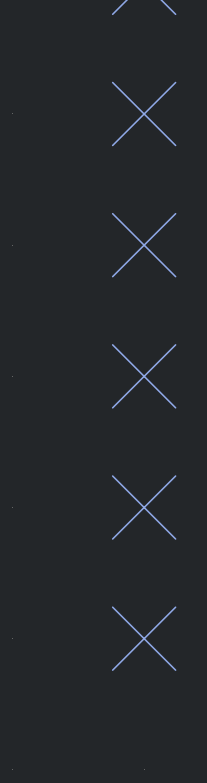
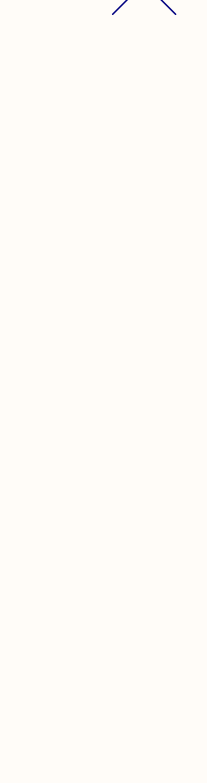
no-connect mark: (144, 113) -> none
no-connect mark: (144, 245) -> none
no-connect mark: (144, 376) -> none
no-connect mark: (144, 507) -> none
no-connect mark: (144, 638) -> none

